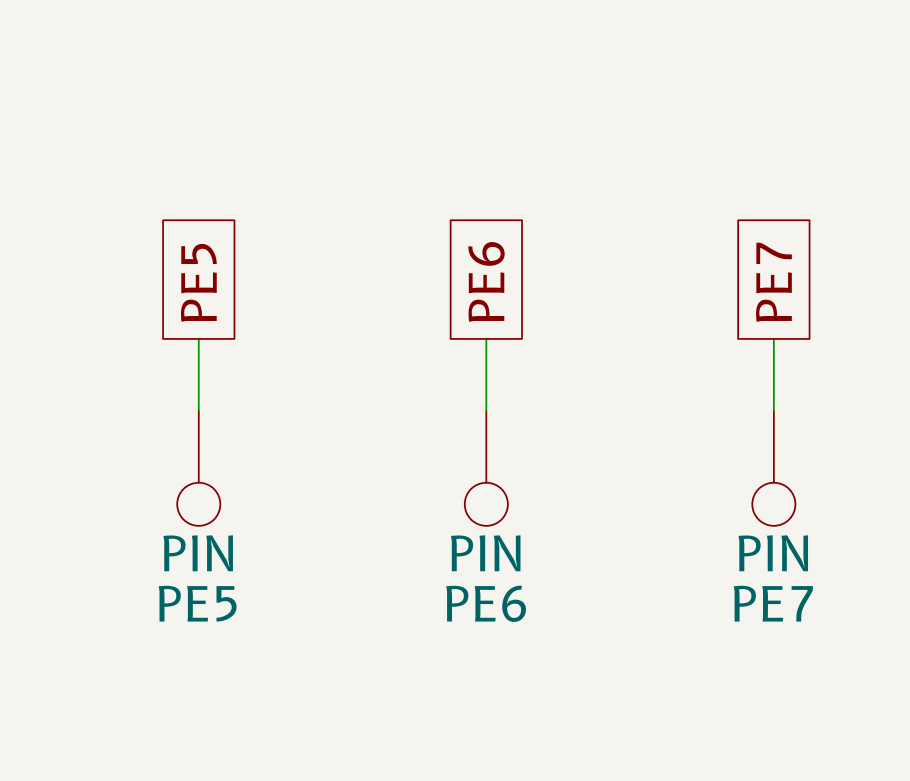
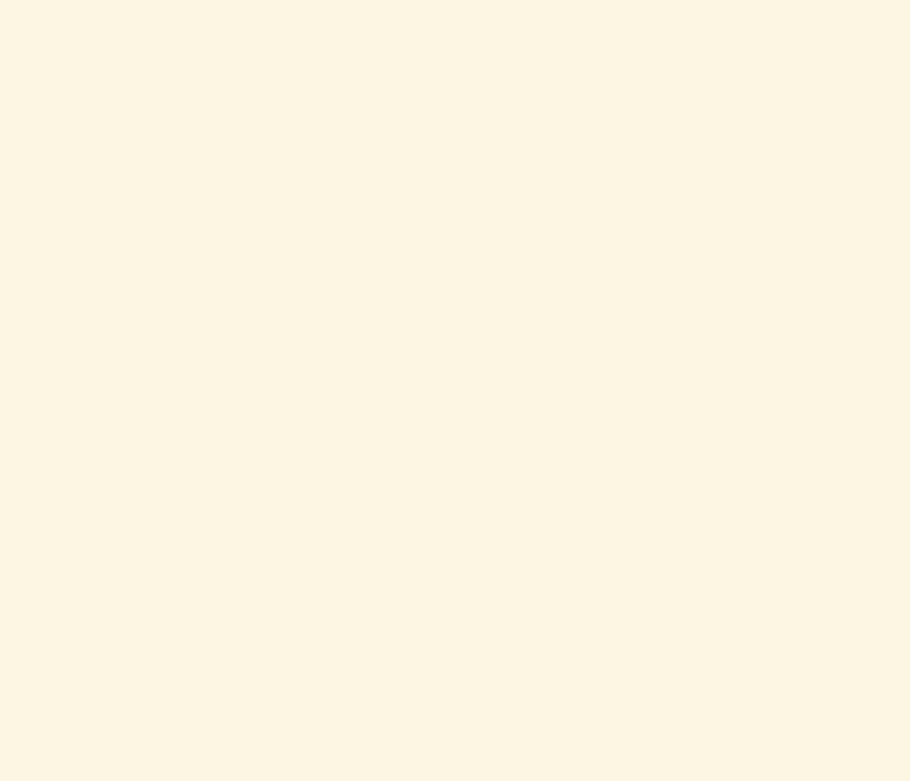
global label: PE6 (486, 281) -> none
global label: PE5 (198, 282) -> none
global label: PE7 (773, 282) -> none
wire: (198, 338) (198, 410) -> none
wire: (486, 338) (486, 410) -> none
wire: (773, 338) (773, 410) -> none
PE5: PIN (198, 468) -> none
PE6: PIN (486, 468) -> none
PE7: PIN (773, 468) -> none

